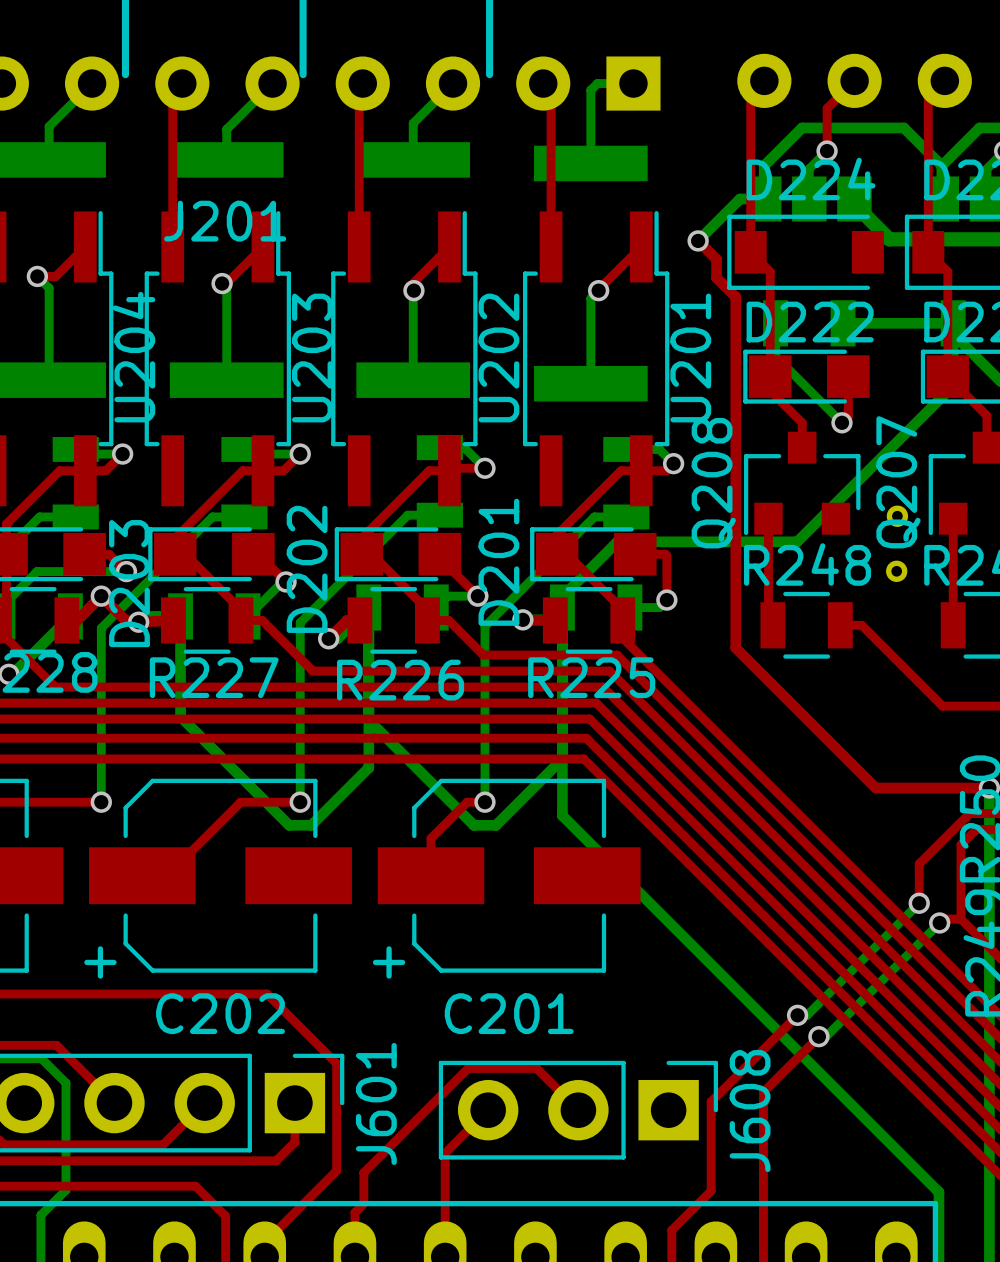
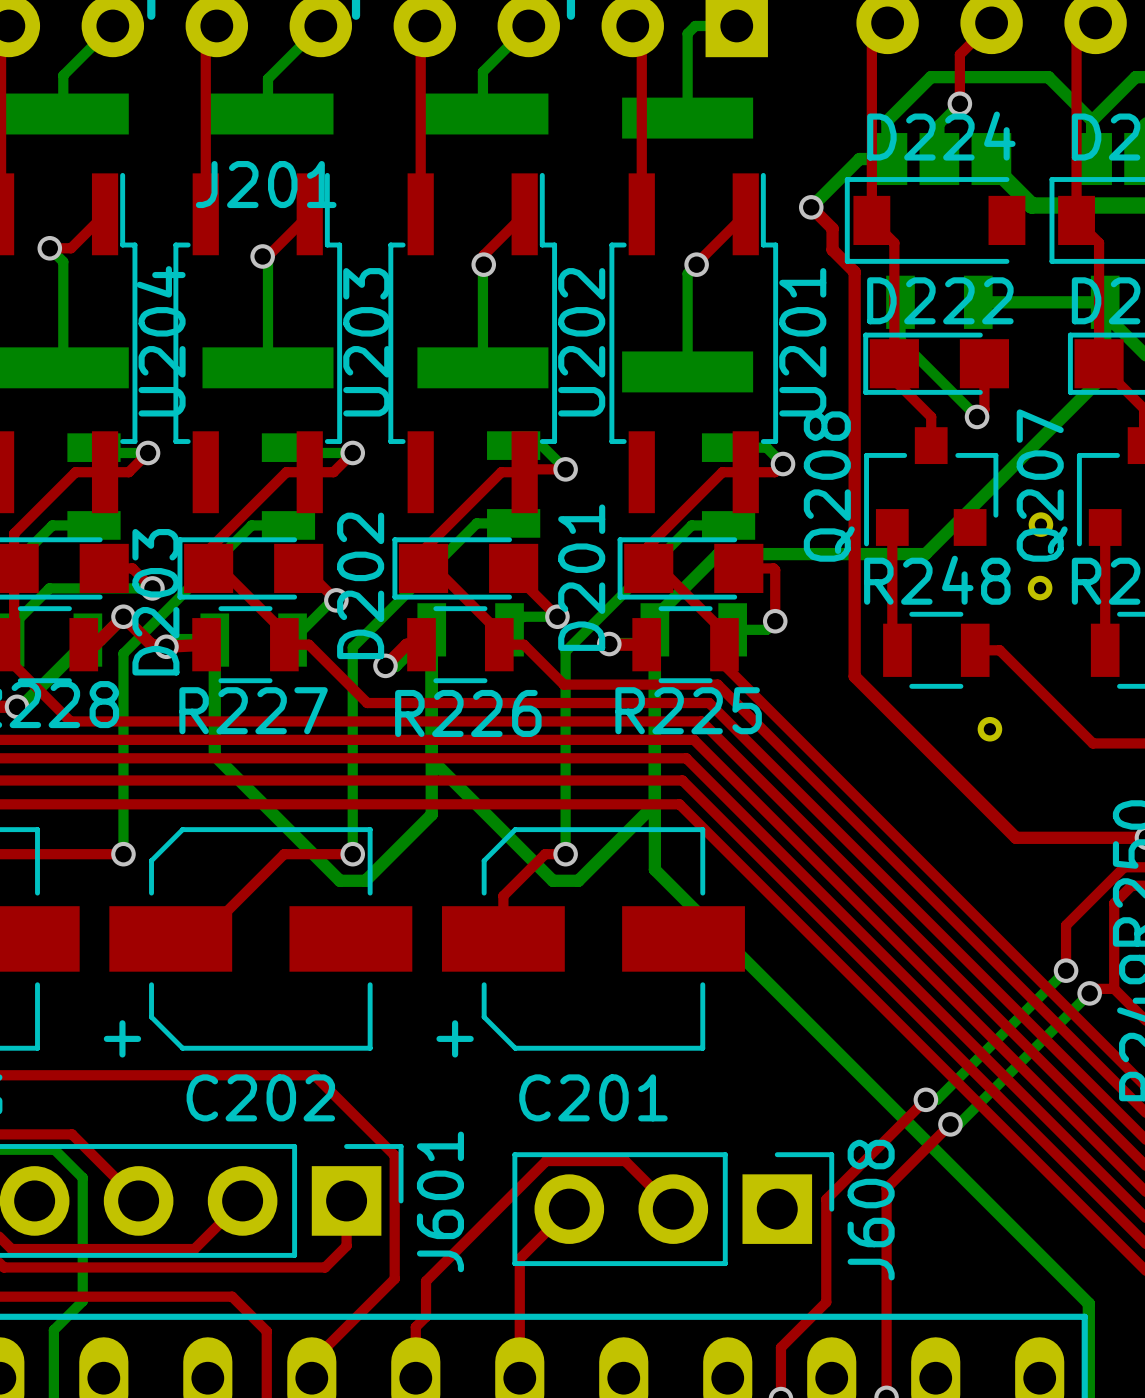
part: none -> (989, 729)

